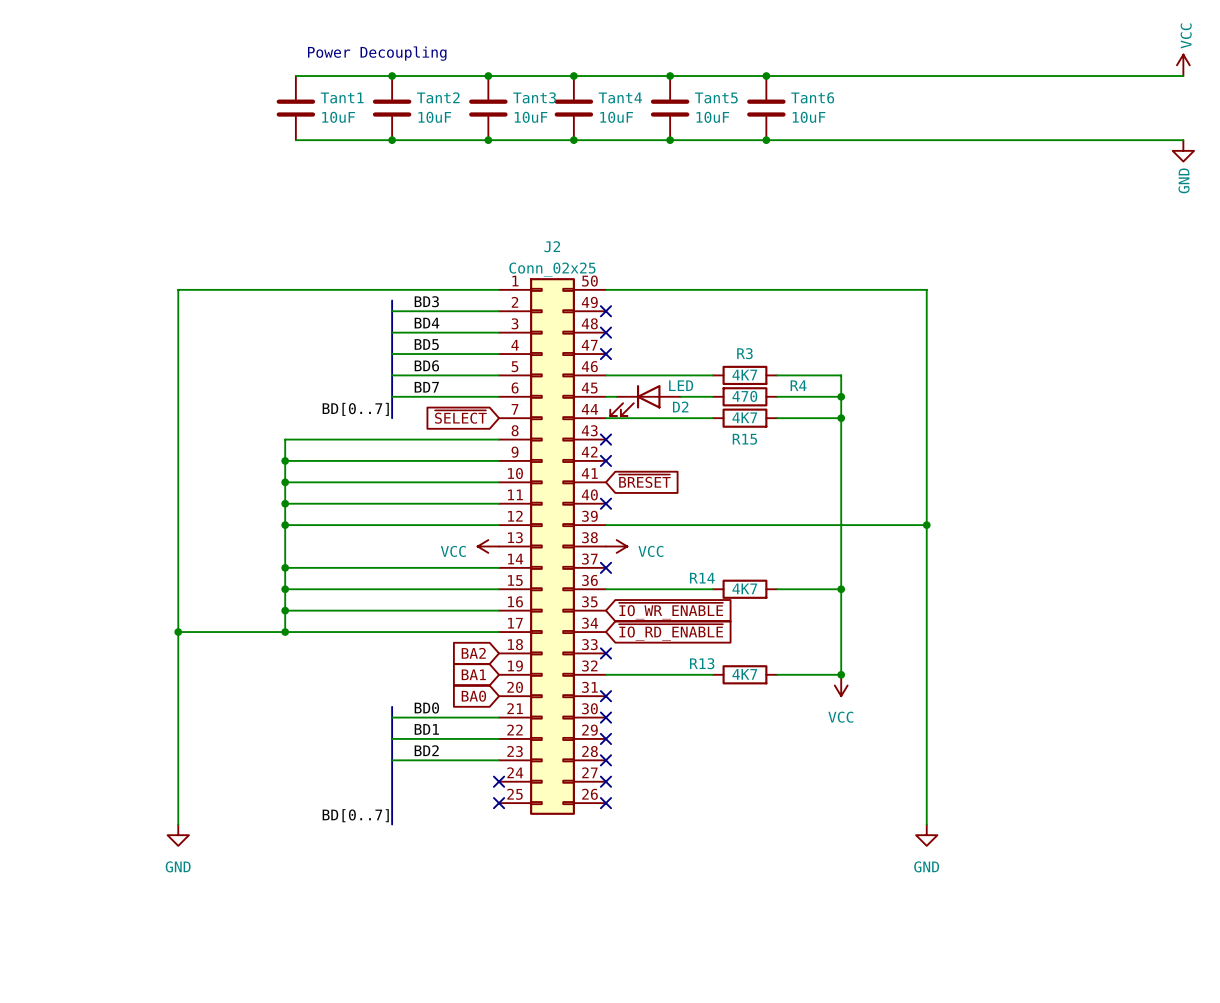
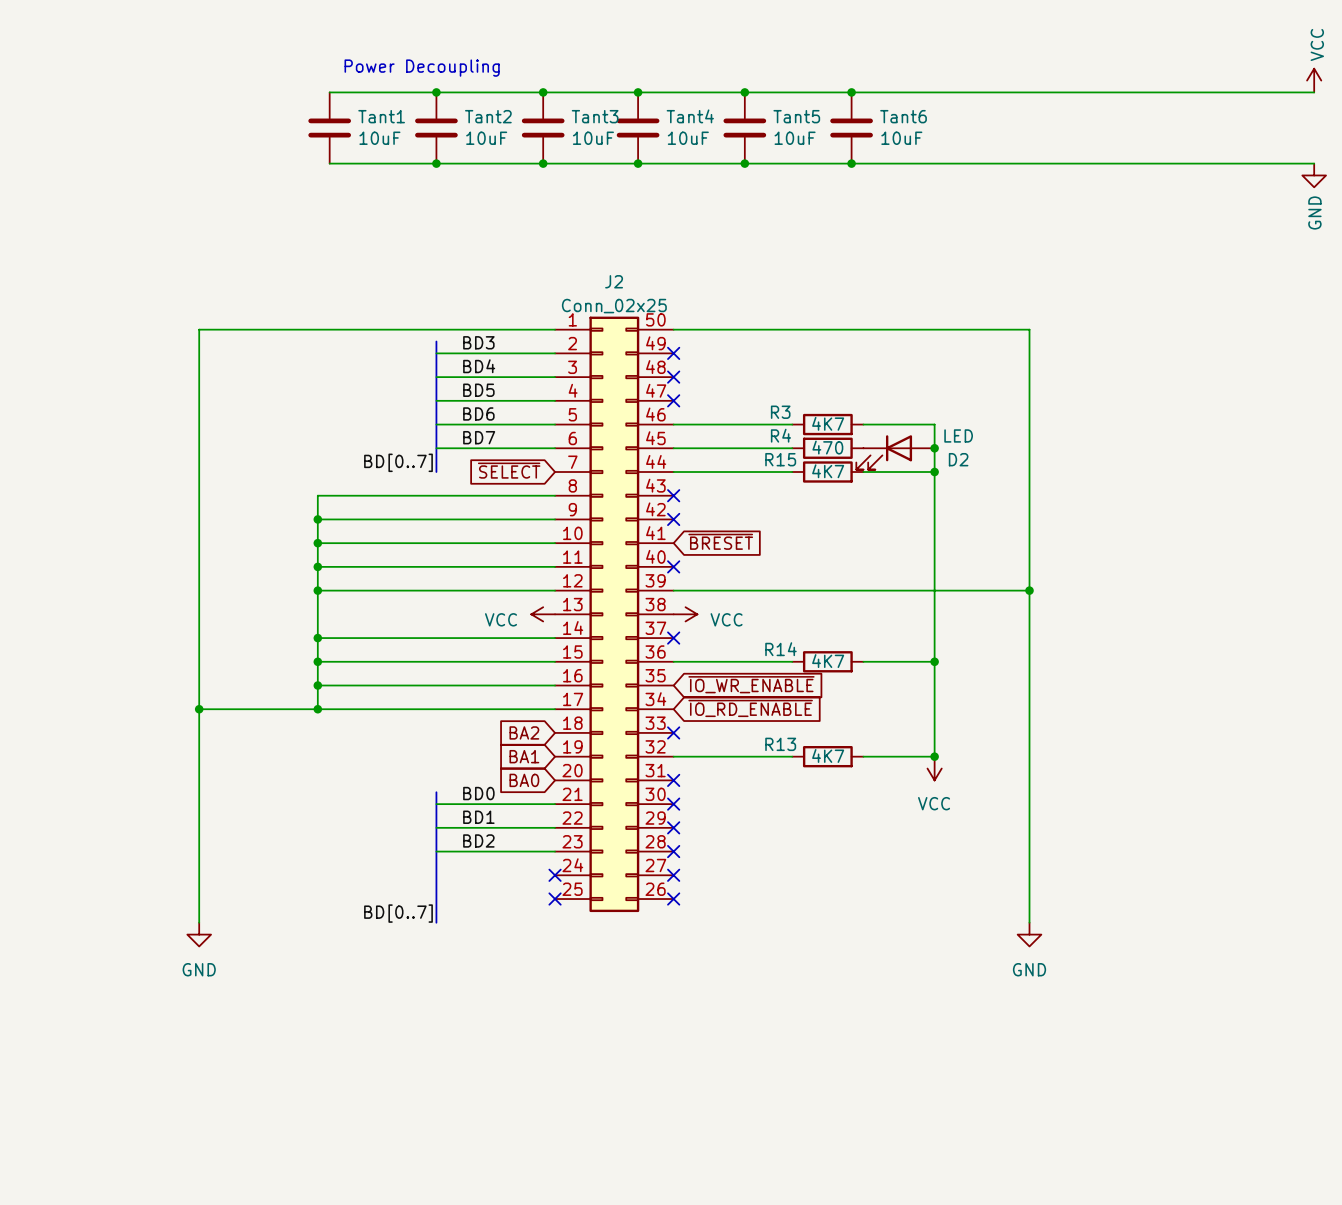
R3 name position: R3 (744, 353) -> R3 (780, 412)
D2 value position: LED (681, 385) -> LED (958, 435)
R4 name position: R4 (798, 385) -> R4 (780, 435)
D2 position: (645, 400) -> (895, 452)
D2 name position: D2 (680, 406) -> D2 (958, 459)
R15 name position: R15 (744, 439) -> R15 (780, 459)

